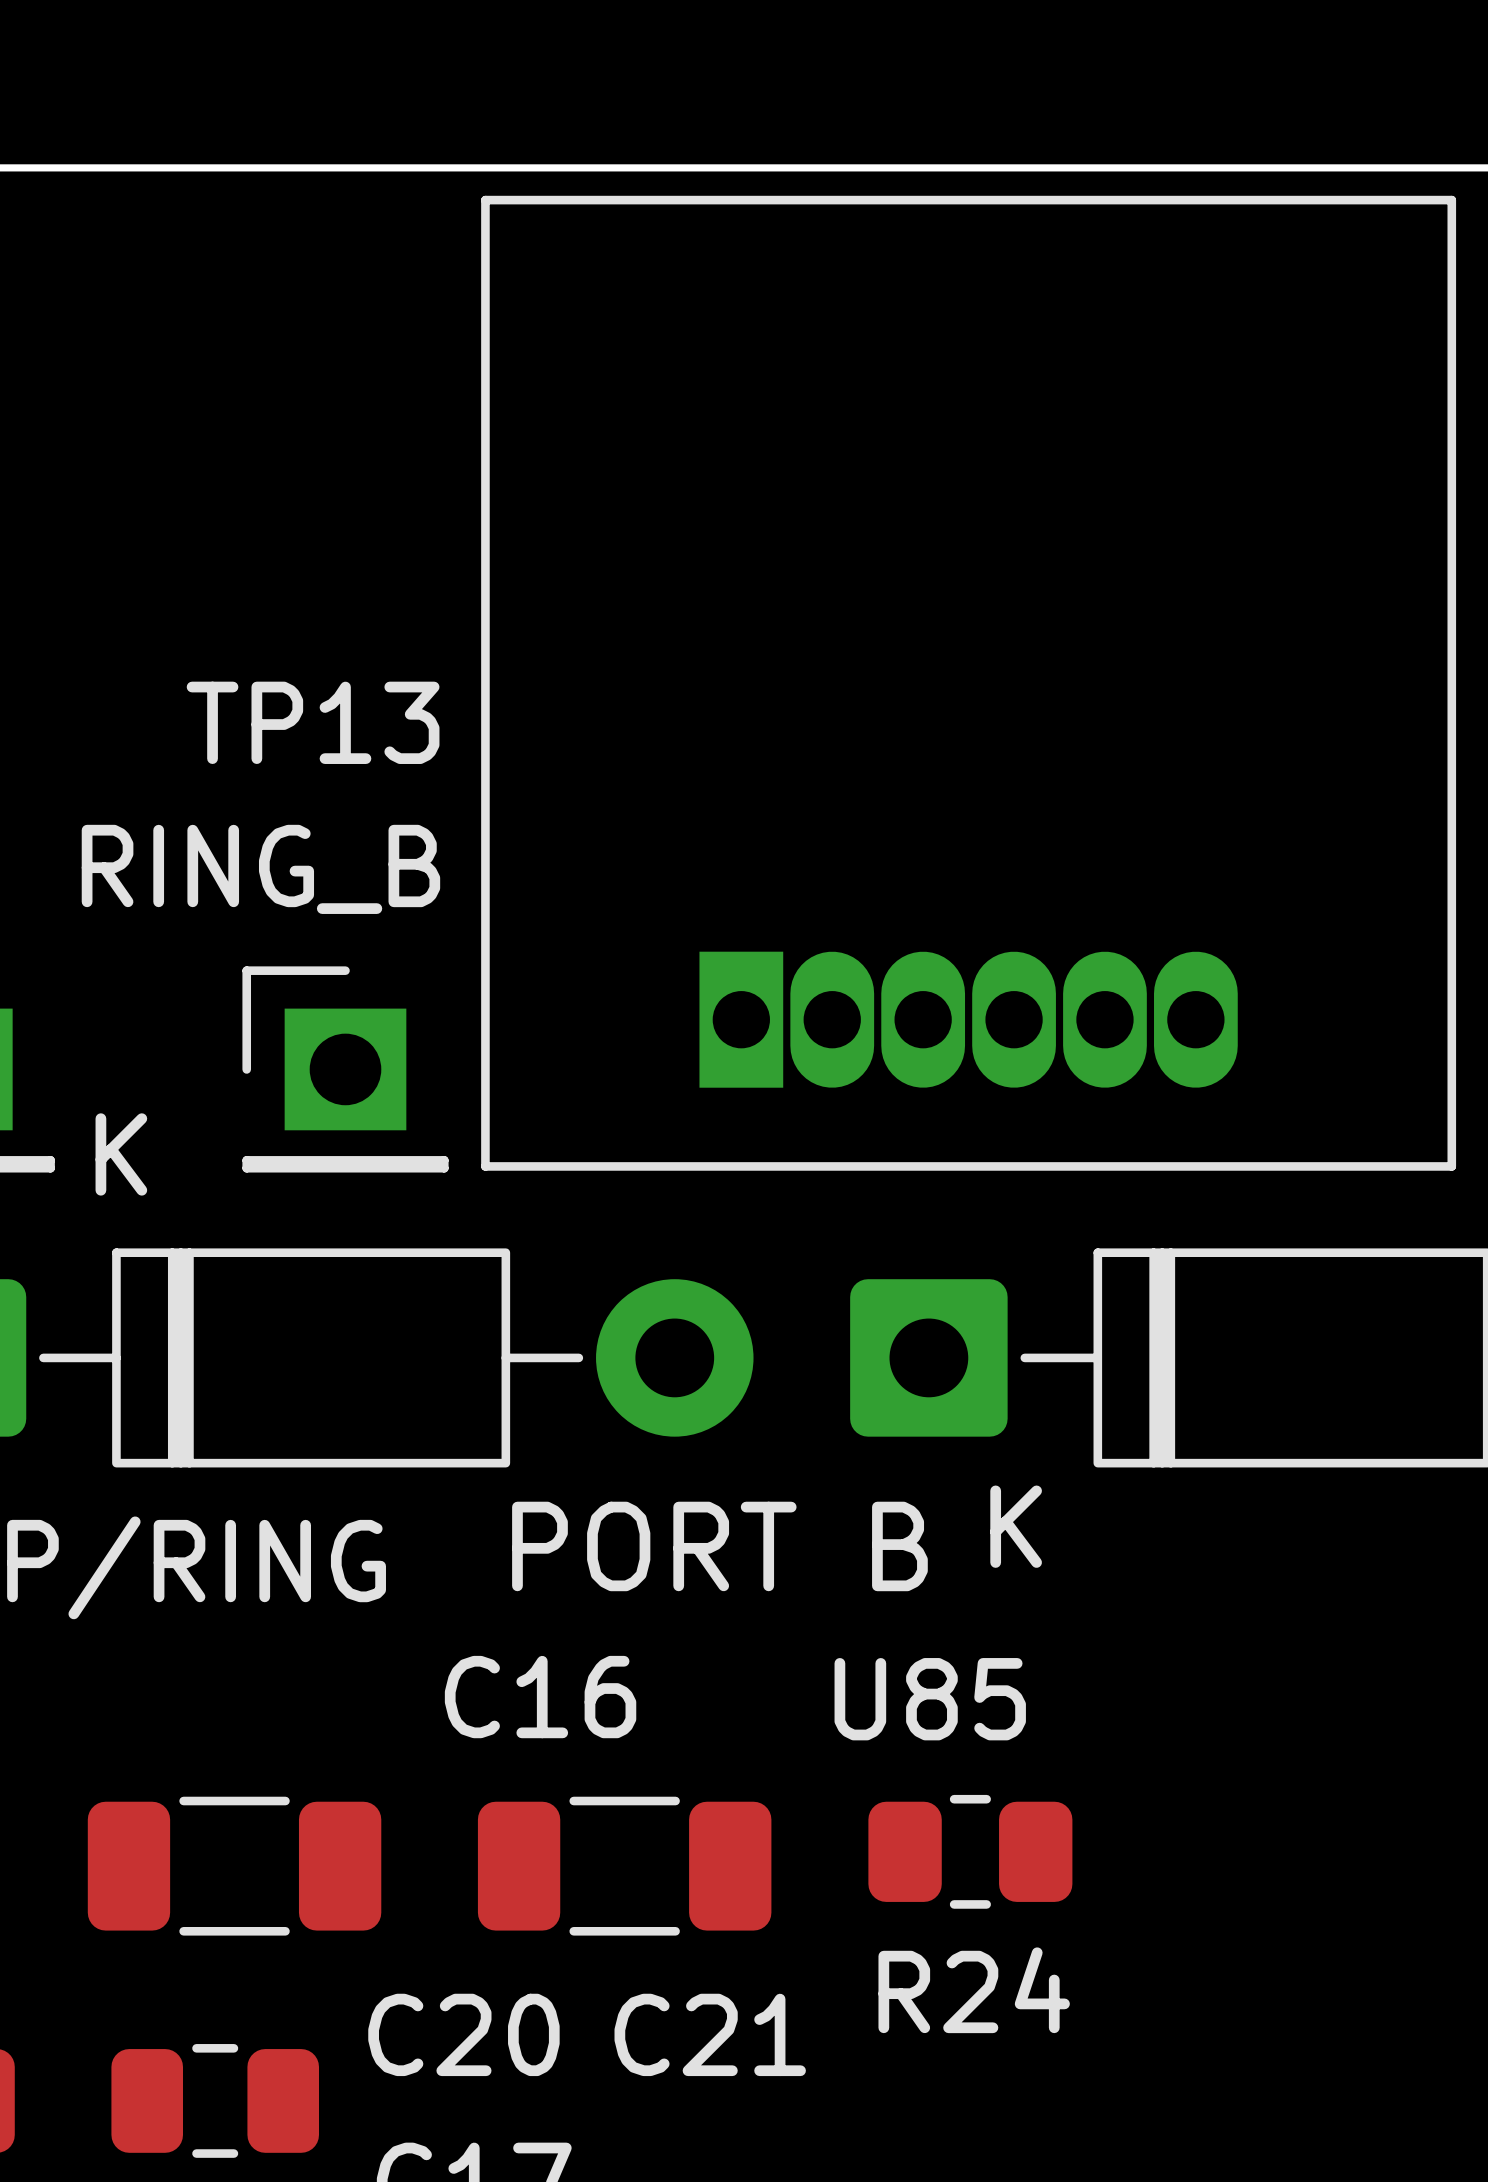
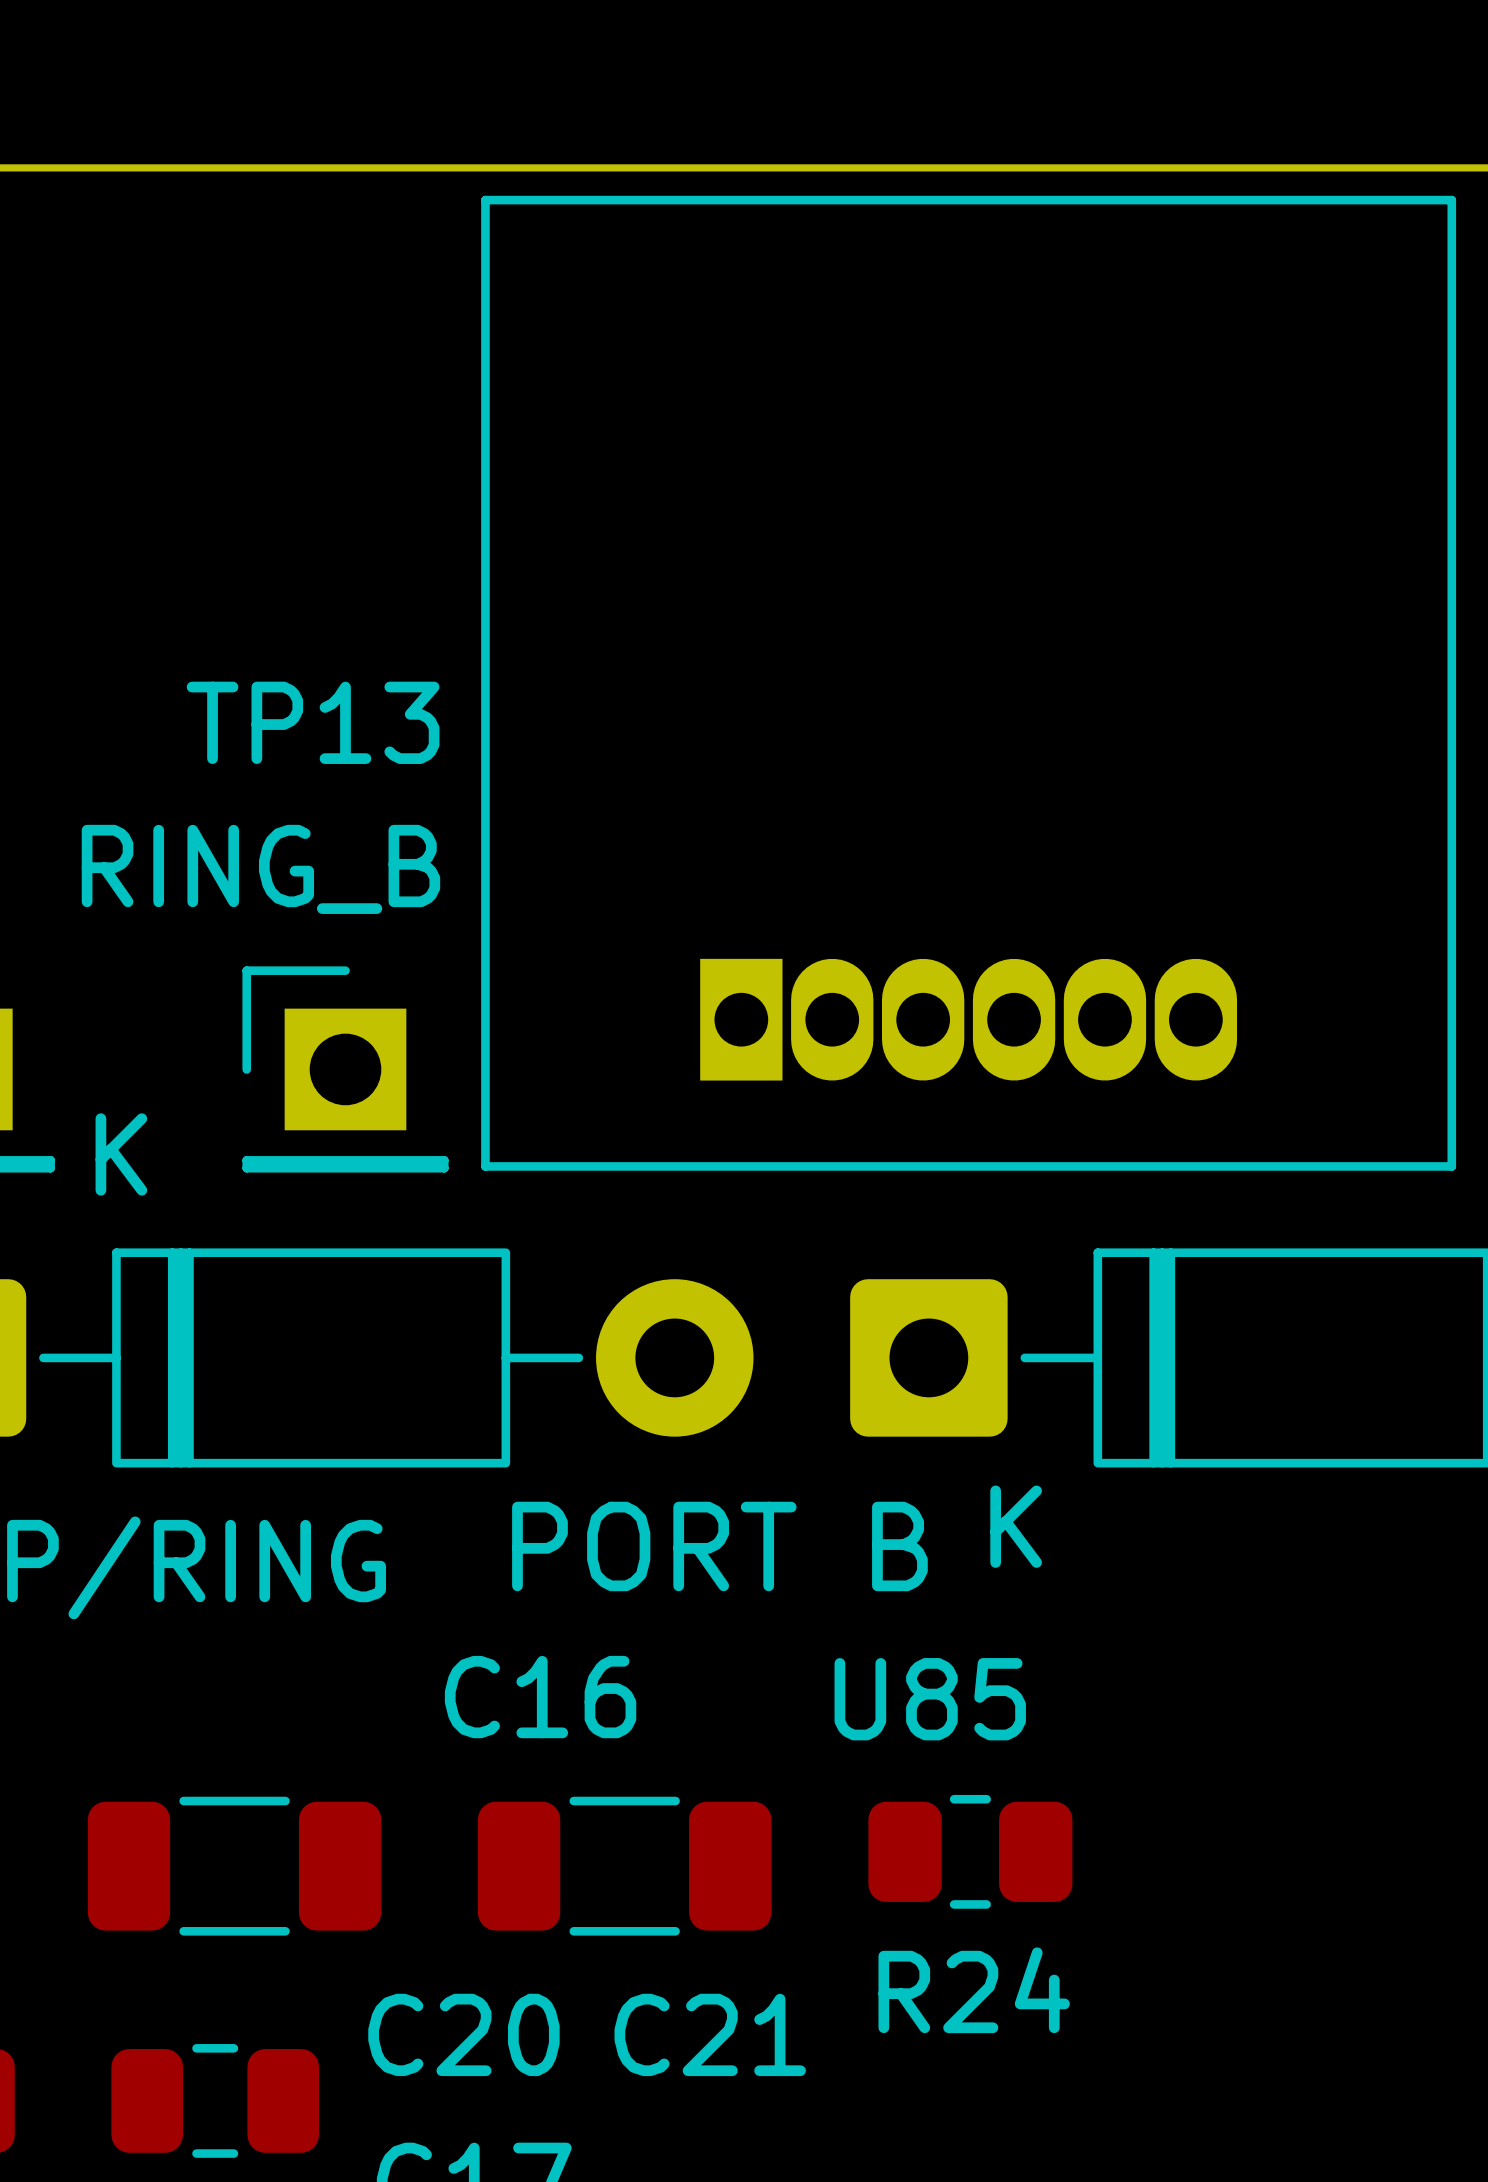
part footprint: [481, 195, 1457, 1171] -> [481, 195, 1457, 1171]

